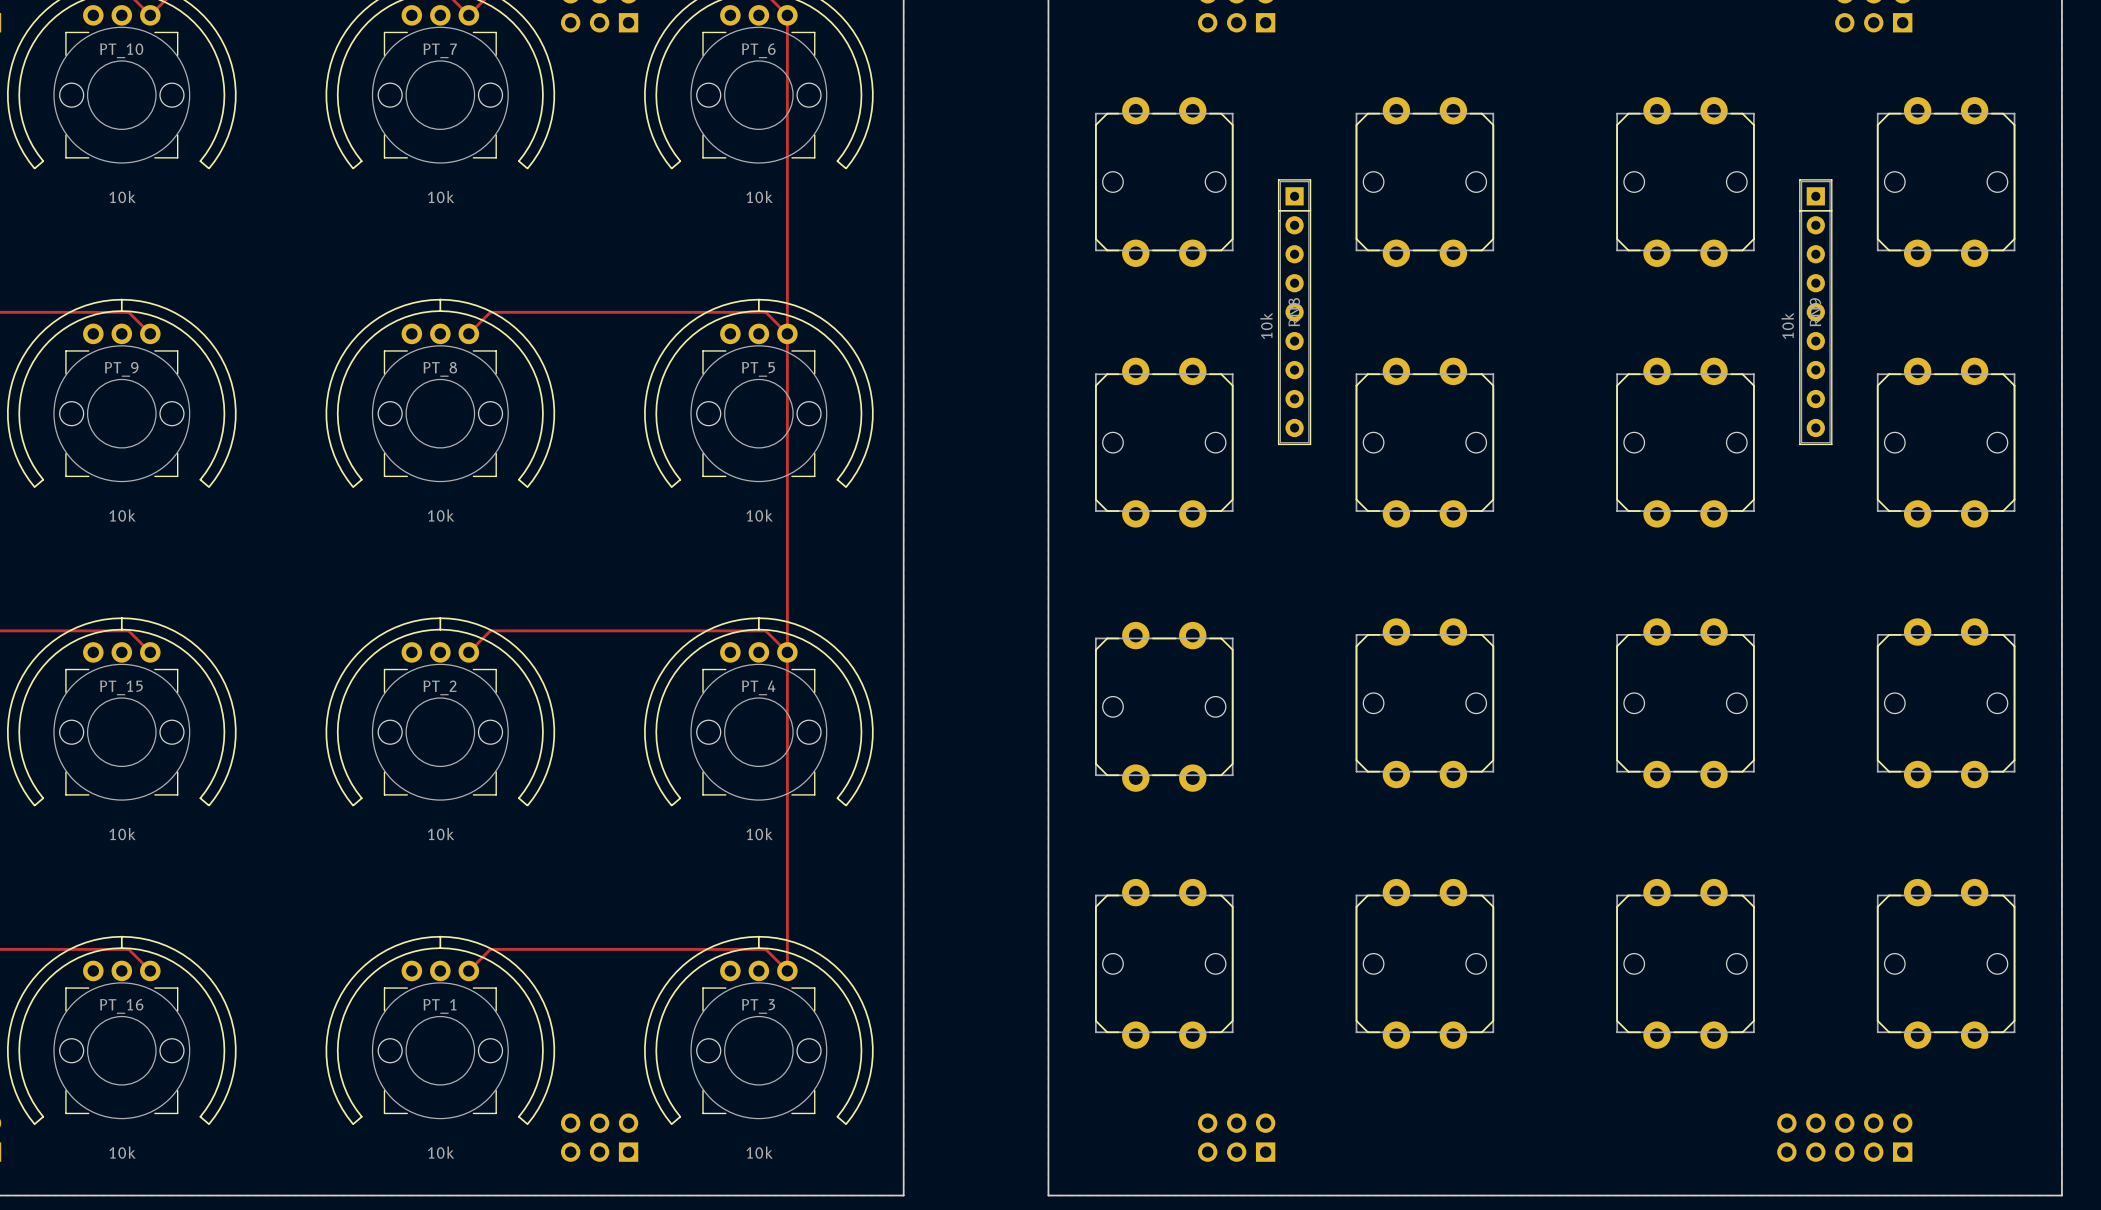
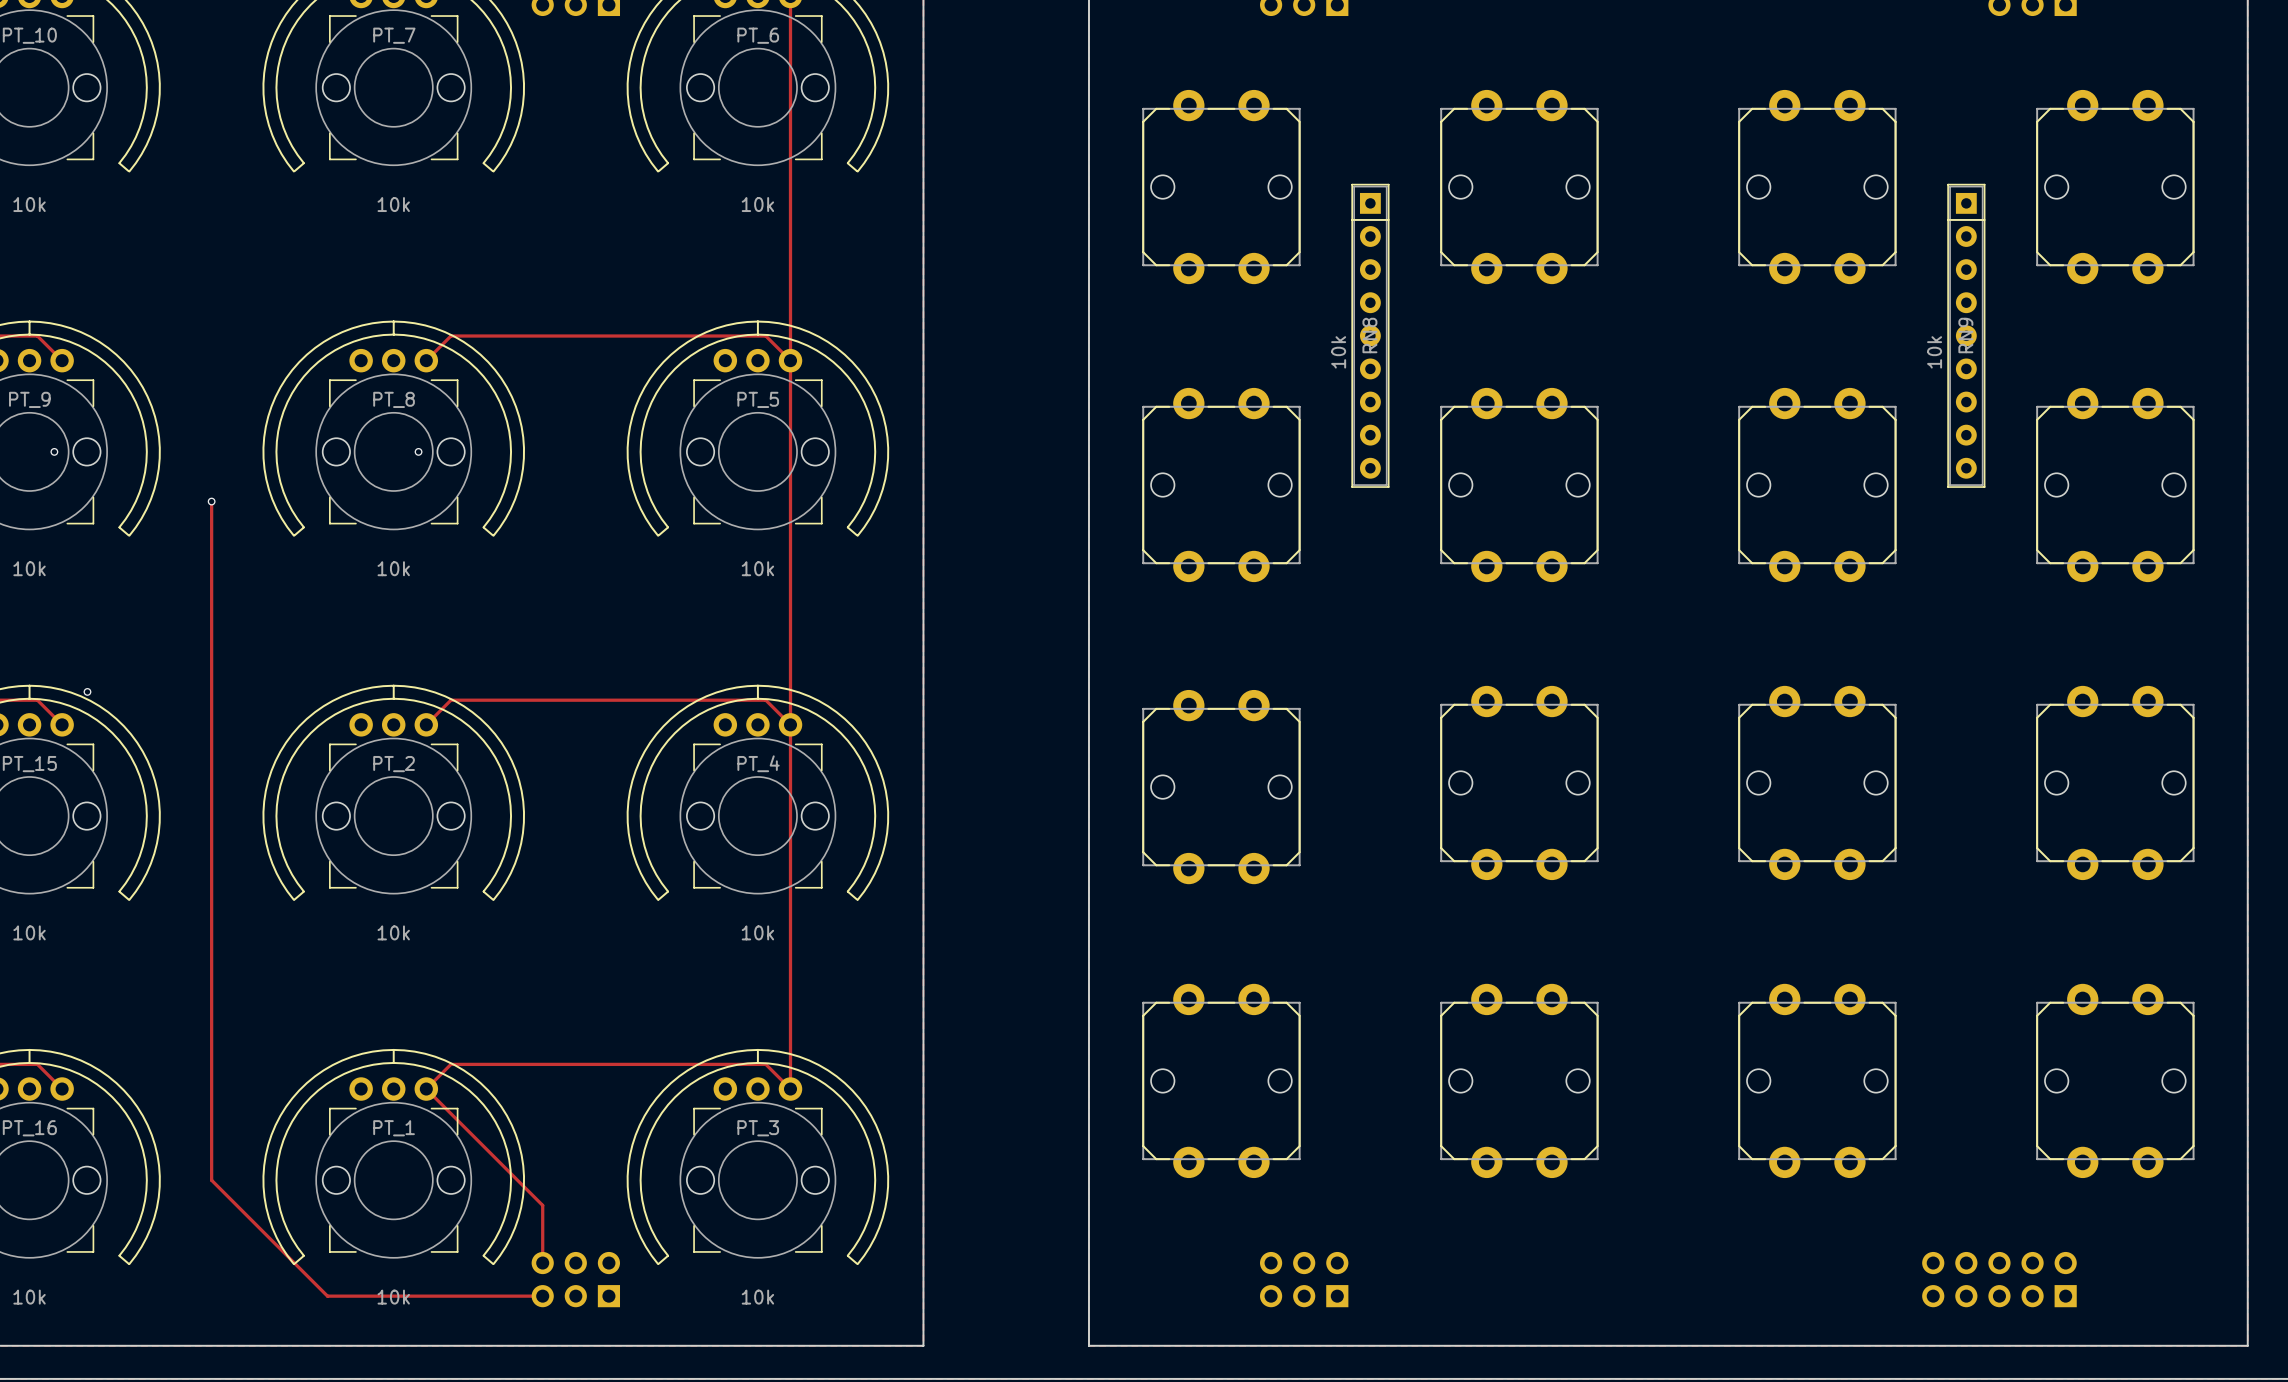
via: none -> (54, 451)
via: none -> (418, 451)
track: none -> (211, 501) (211, 1180) (327, 1296) (542, 1296)
via: none -> (211, 501)
via: none -> (87, 691)
track: none -> (426, 1089) (542, 1205) (542, 1263)

